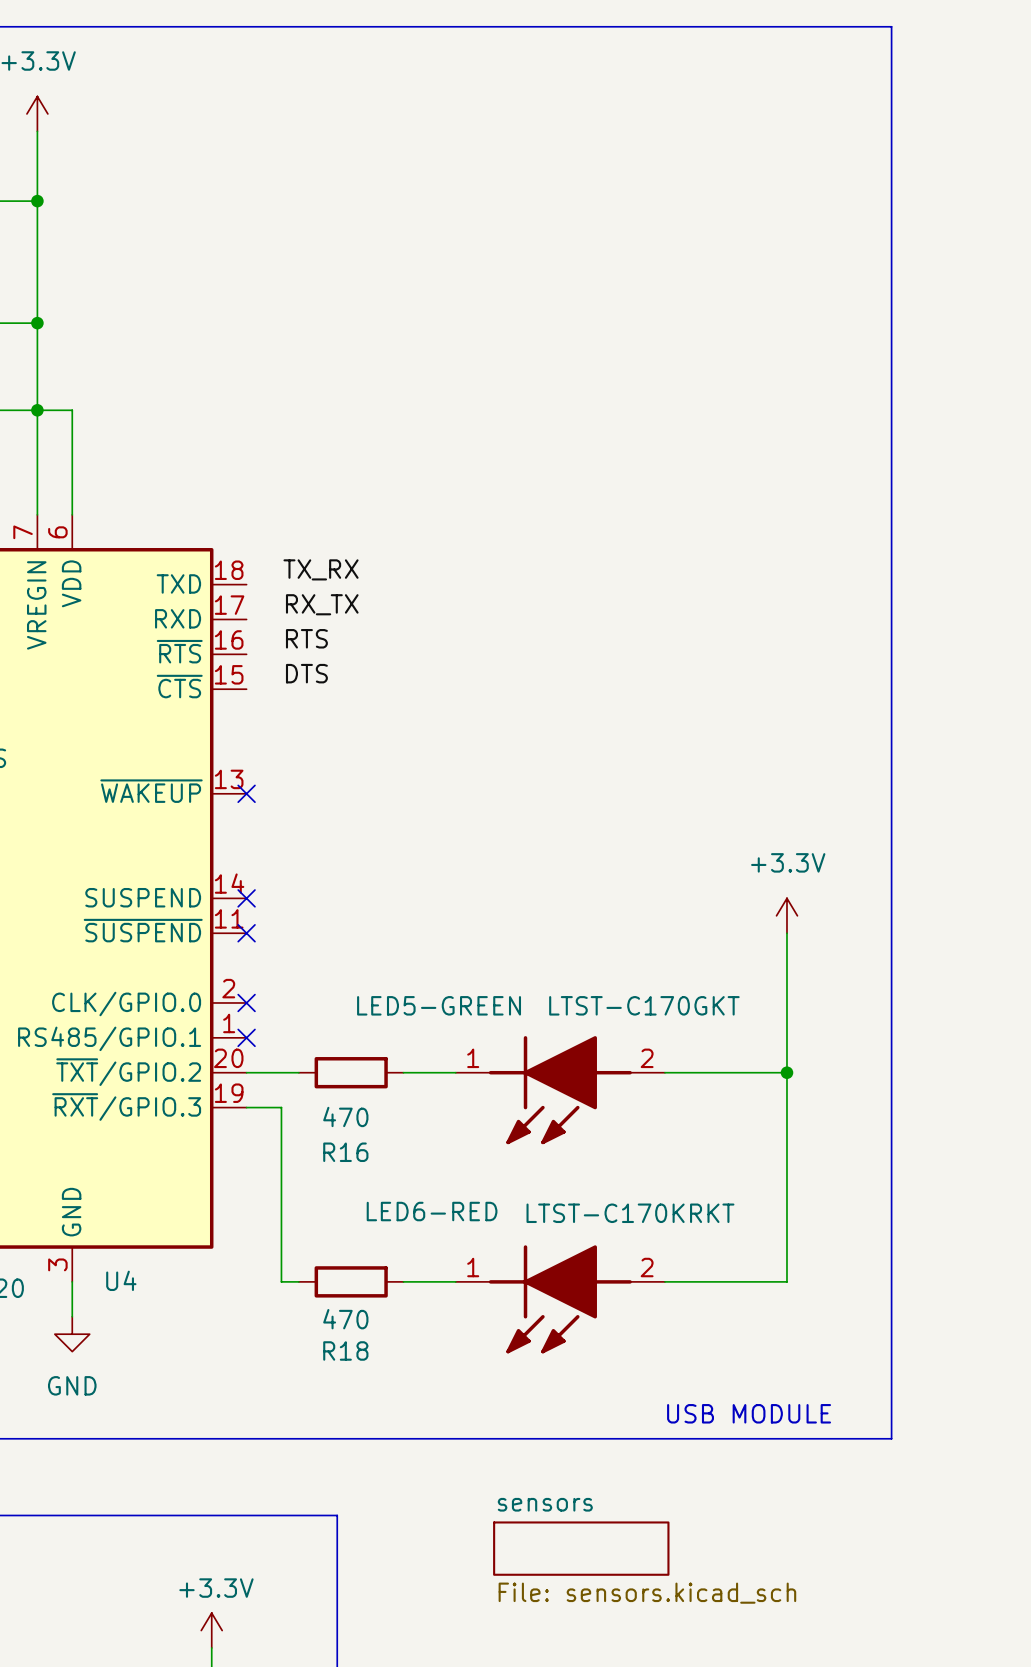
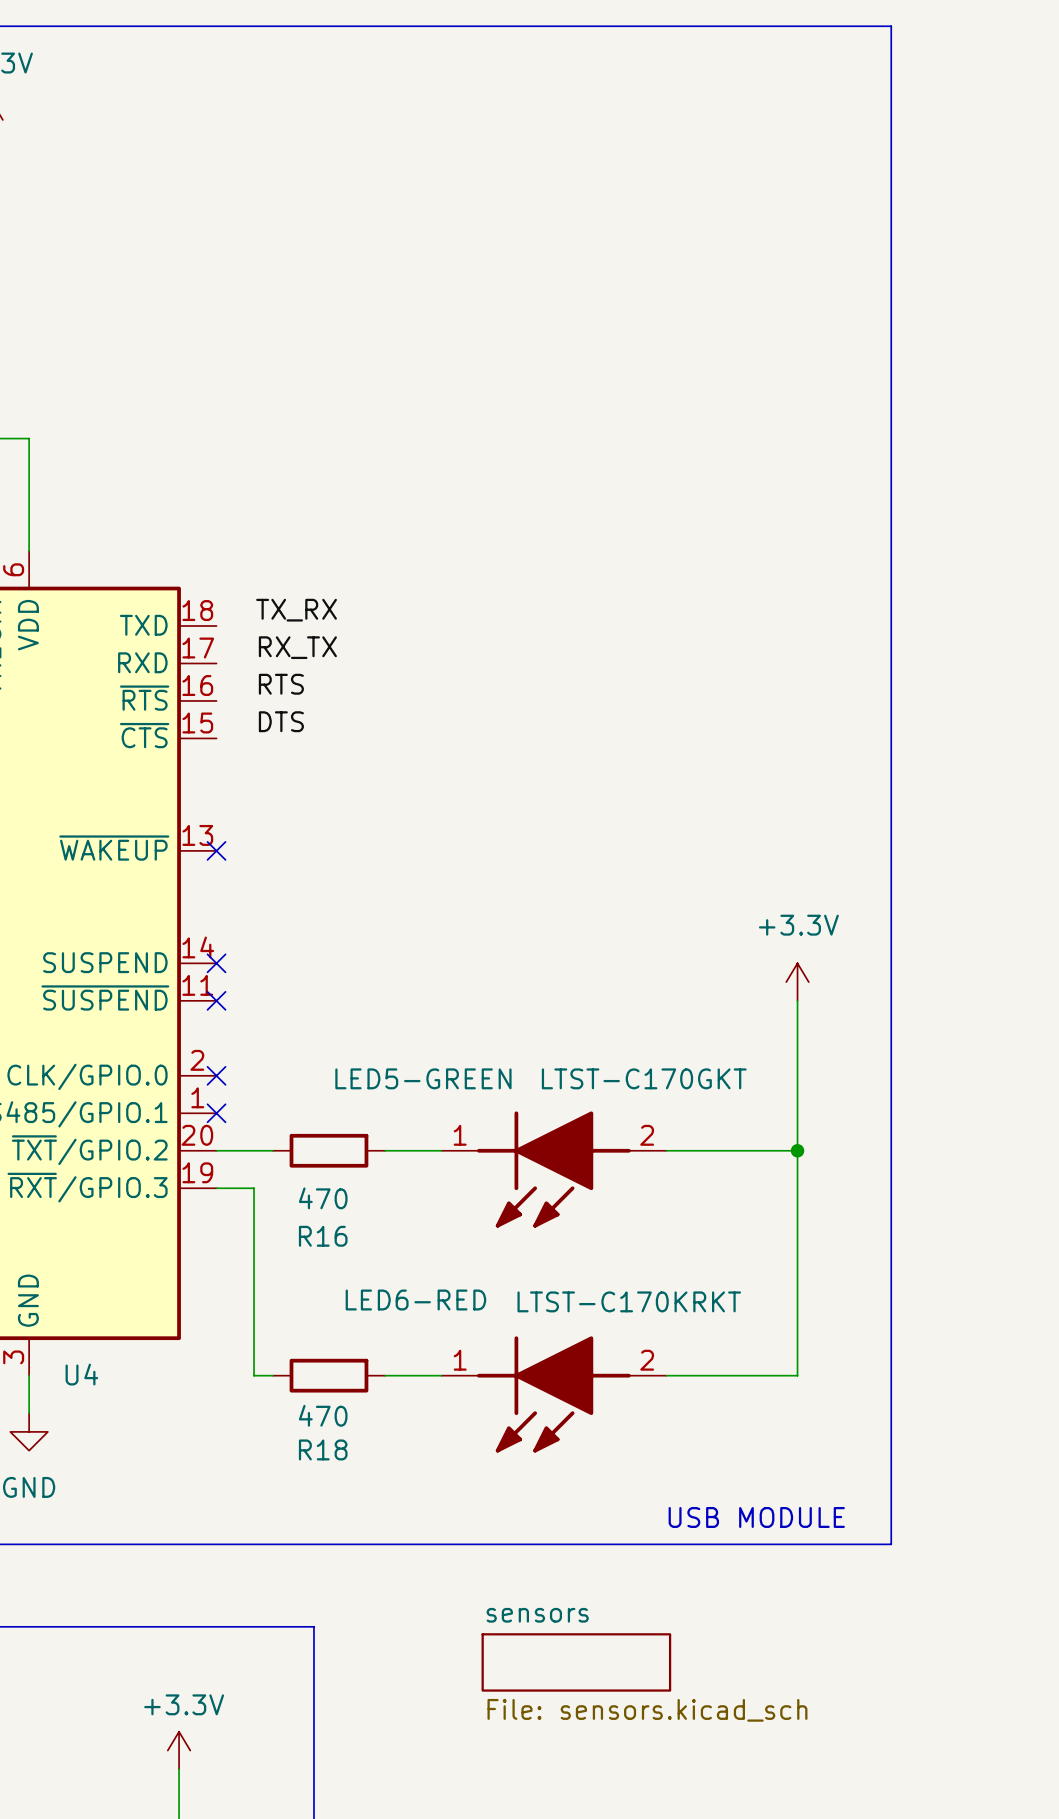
line: (874, 26) (891, 26) (891, 1438) (874, 1438) -> (891, 26) (891, 1544)

